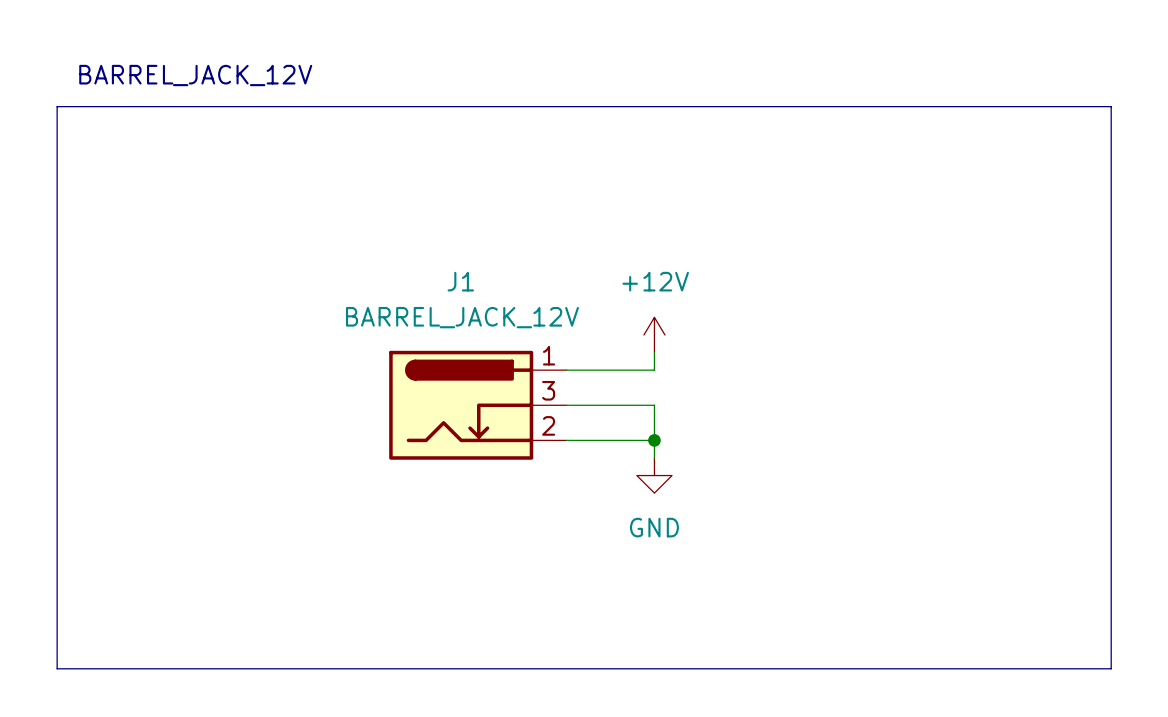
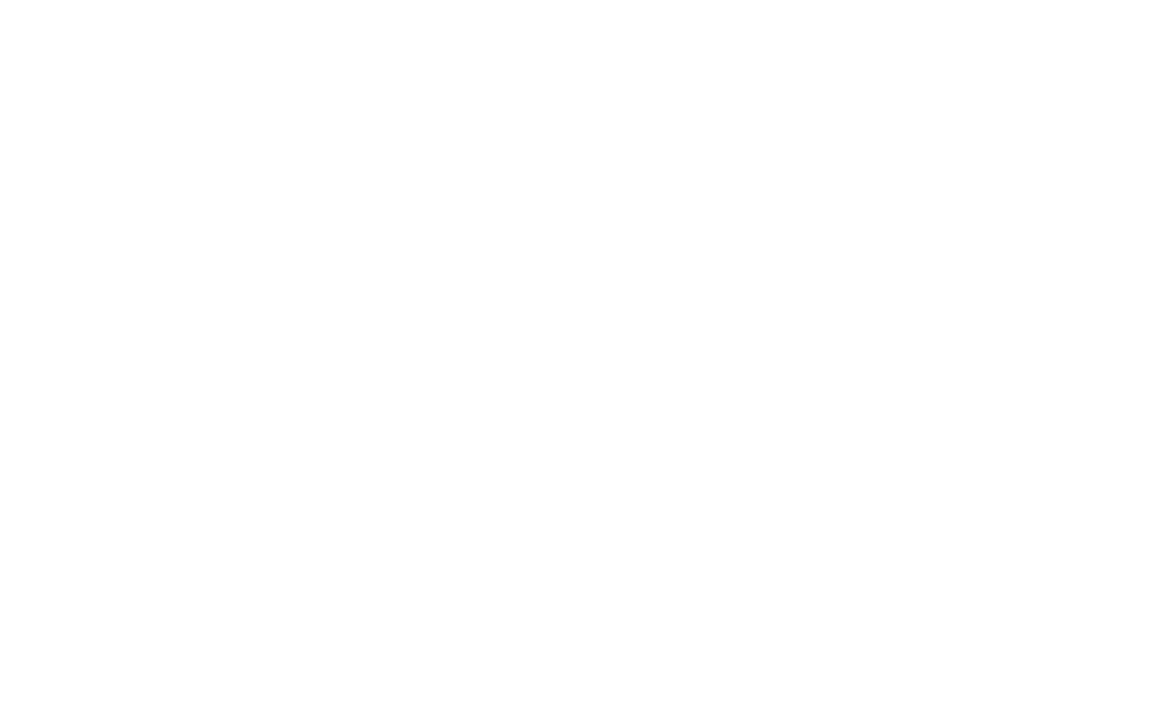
text: BARREL_JACK_12V (195, 75) -> none
line: (57, 106) (1111, 106) (1111, 668) (57, 668) (57, 106) -> none
power symbol: +12V (654, 335) -> none
wire: (654, 352) (654, 370) (566, 370) -> none
J1: BARREL_JACK_12V (477, 405) -> none
wire: (566, 405) (654, 405) (654, 457) -> none
wire: (566, 440) (654, 440) -> none
junction: (654, 440) -> none
power symbol: GND (654, 475) -> none

